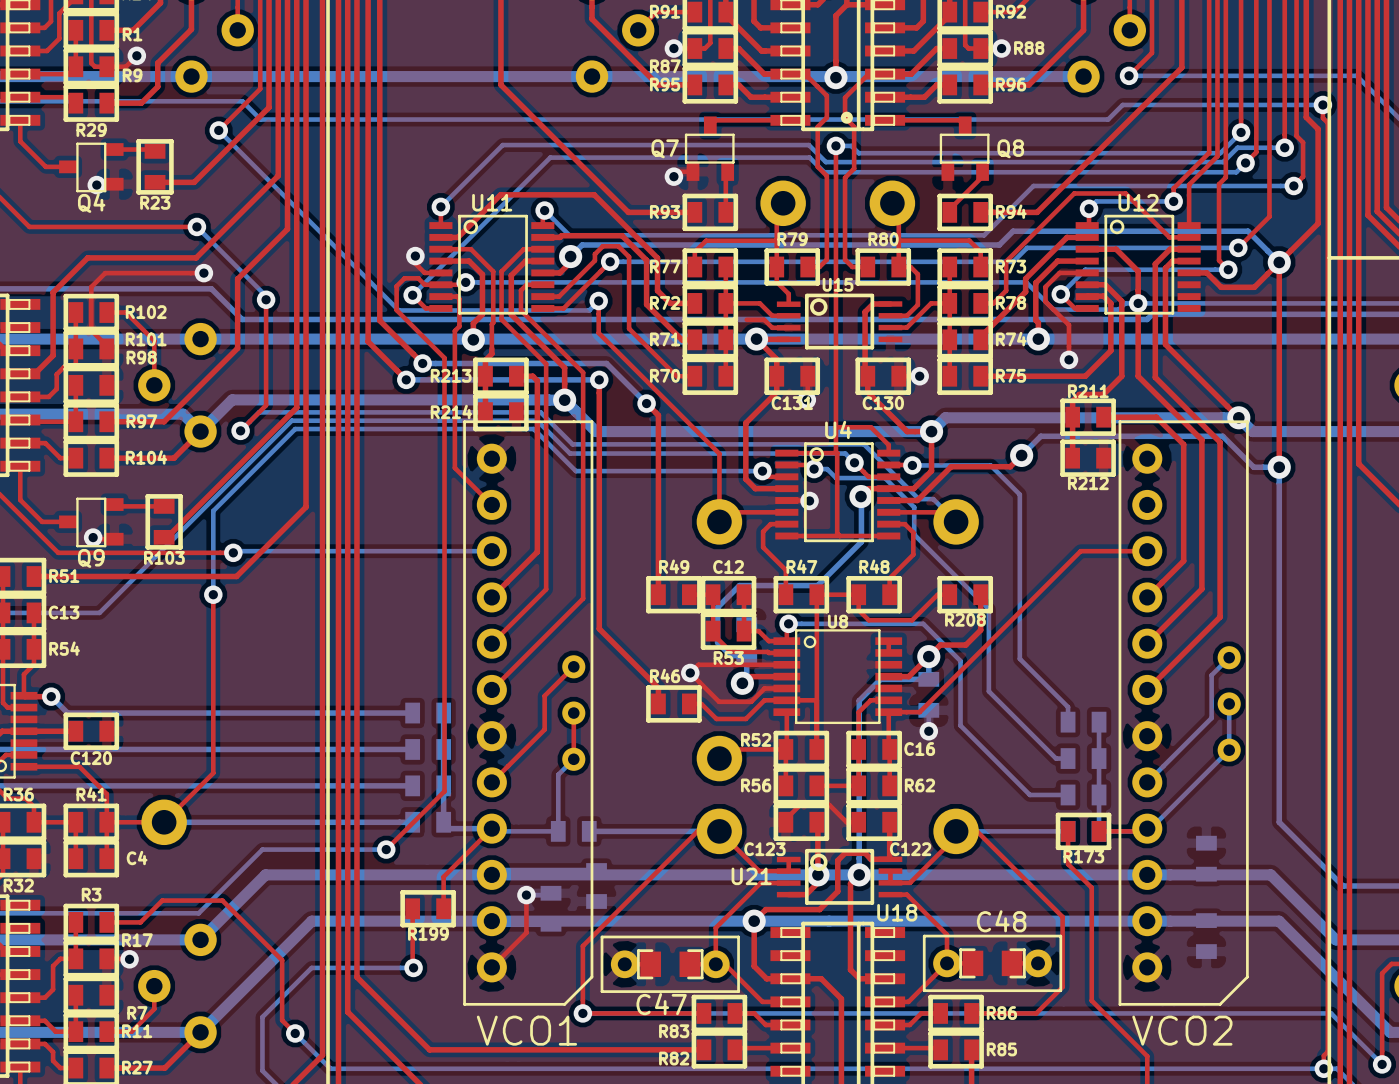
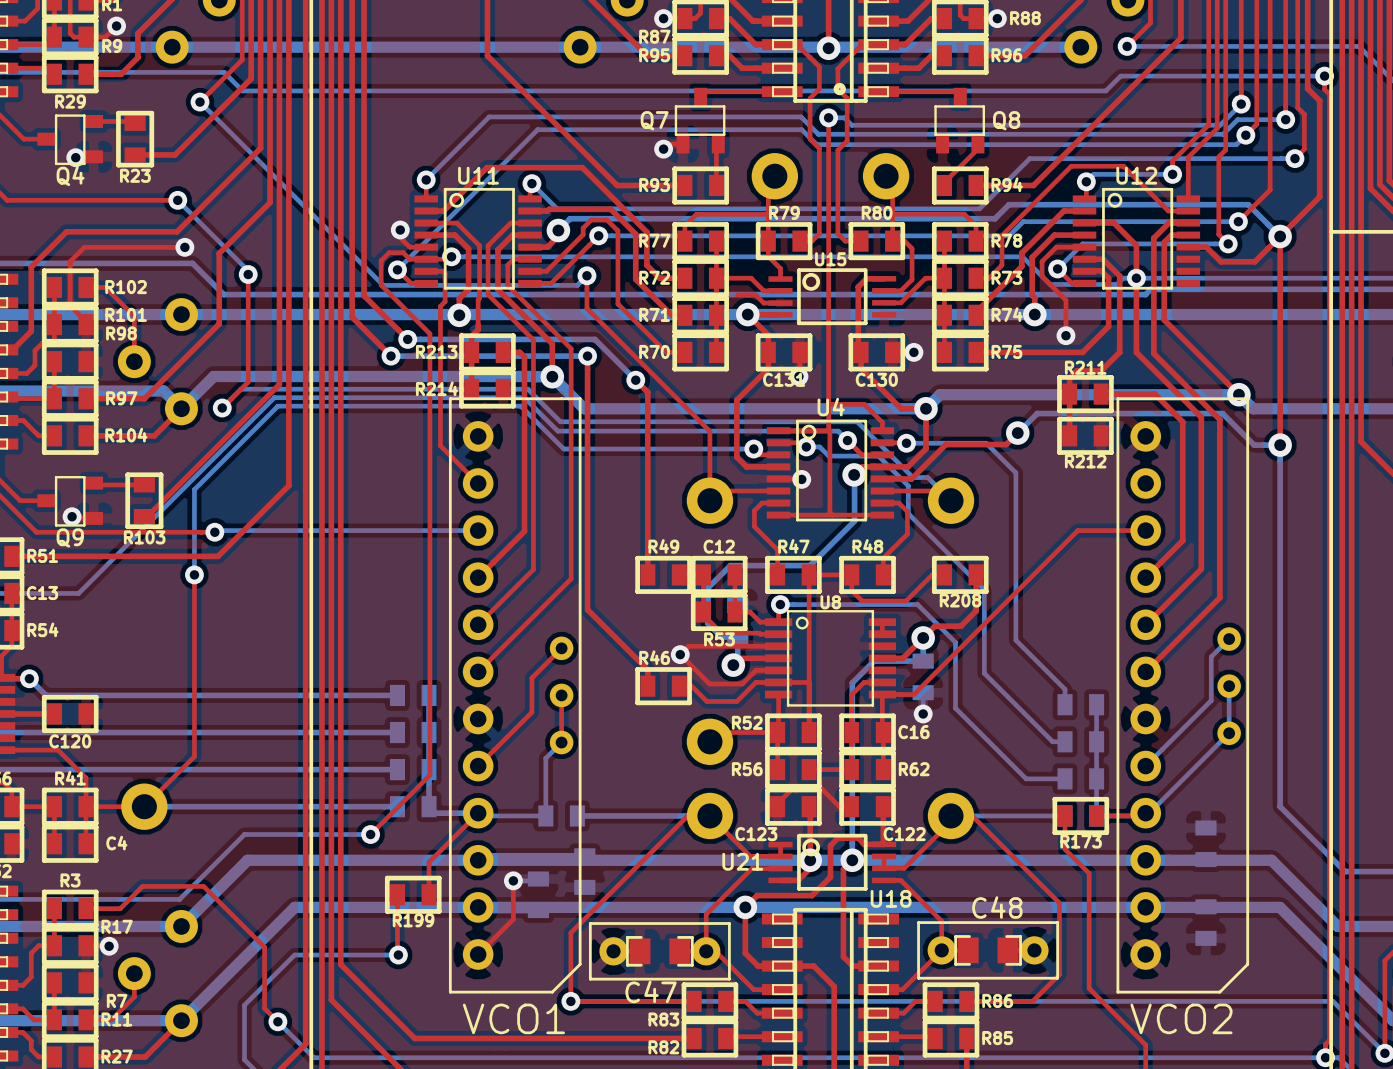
R73 name position: R73 (1010, 266) -> R73 (1006, 277)
R78 name position: R78 (1010, 302) -> R78 (1006, 240)

